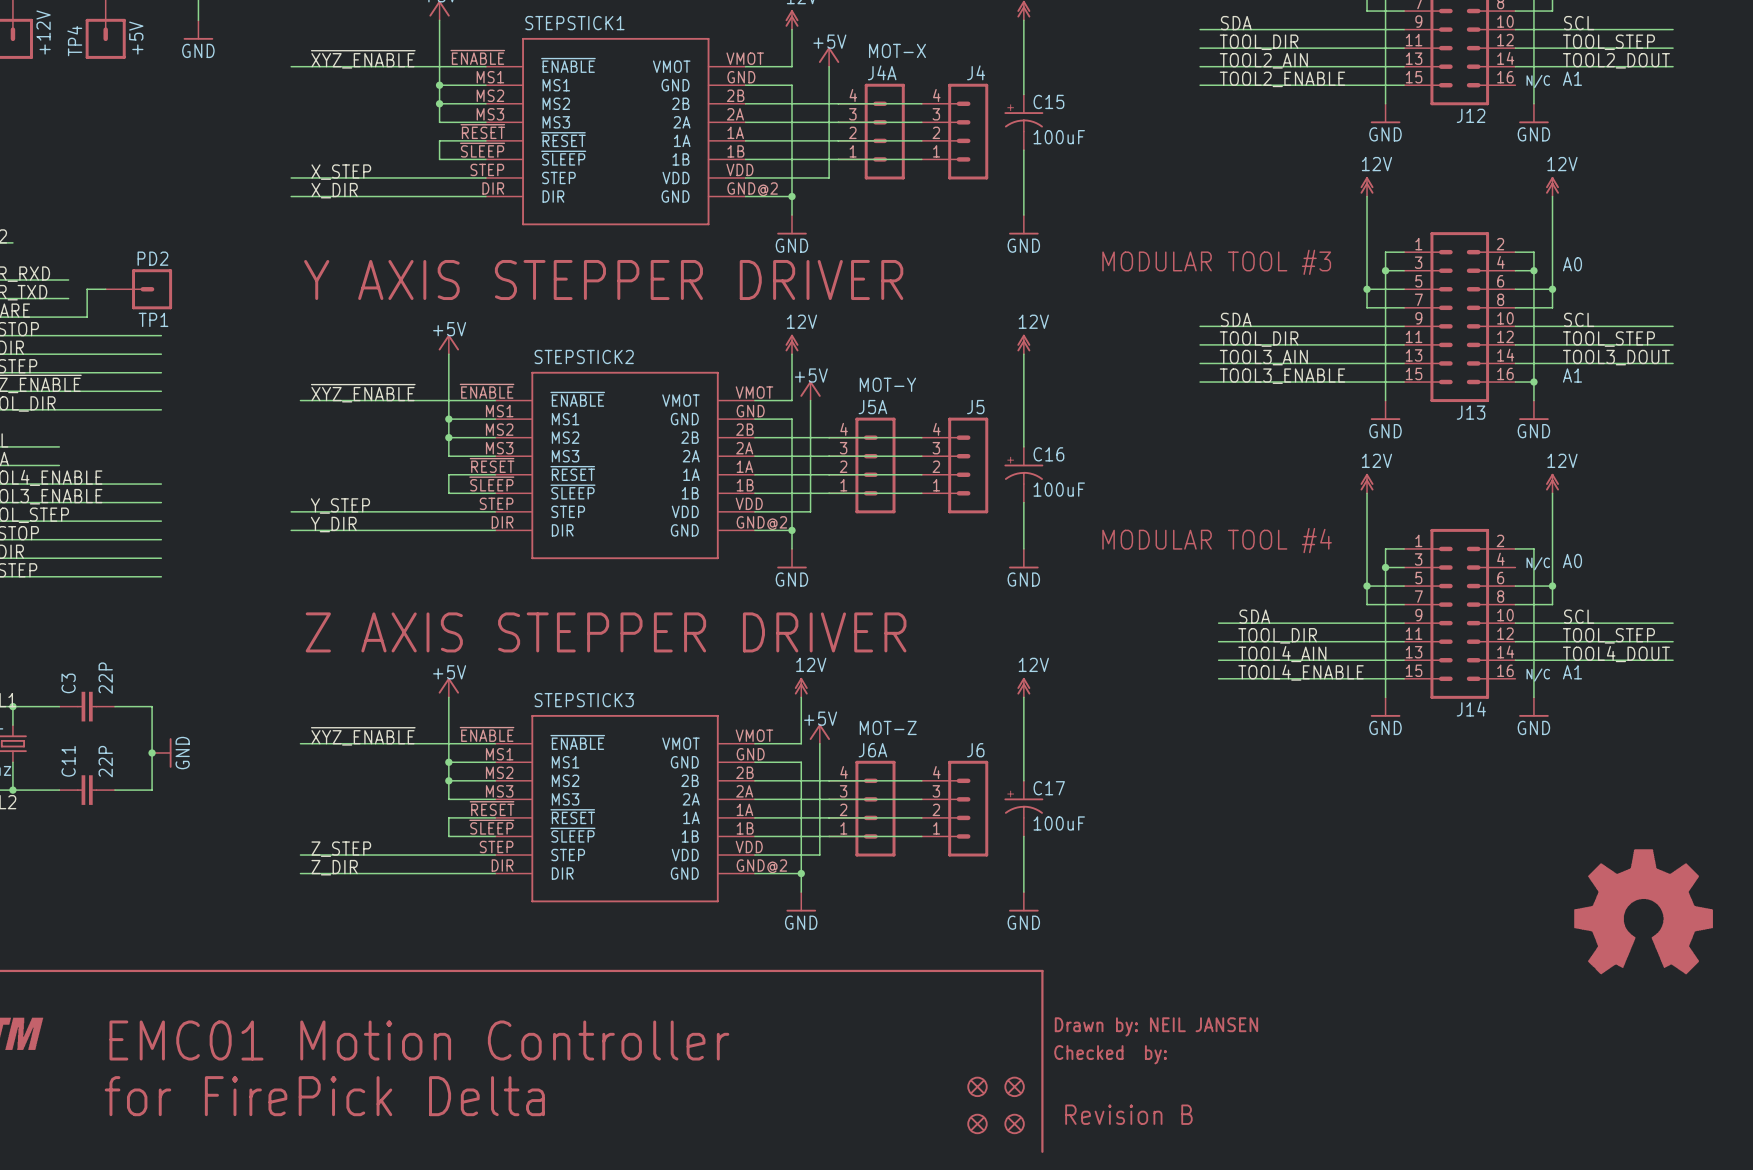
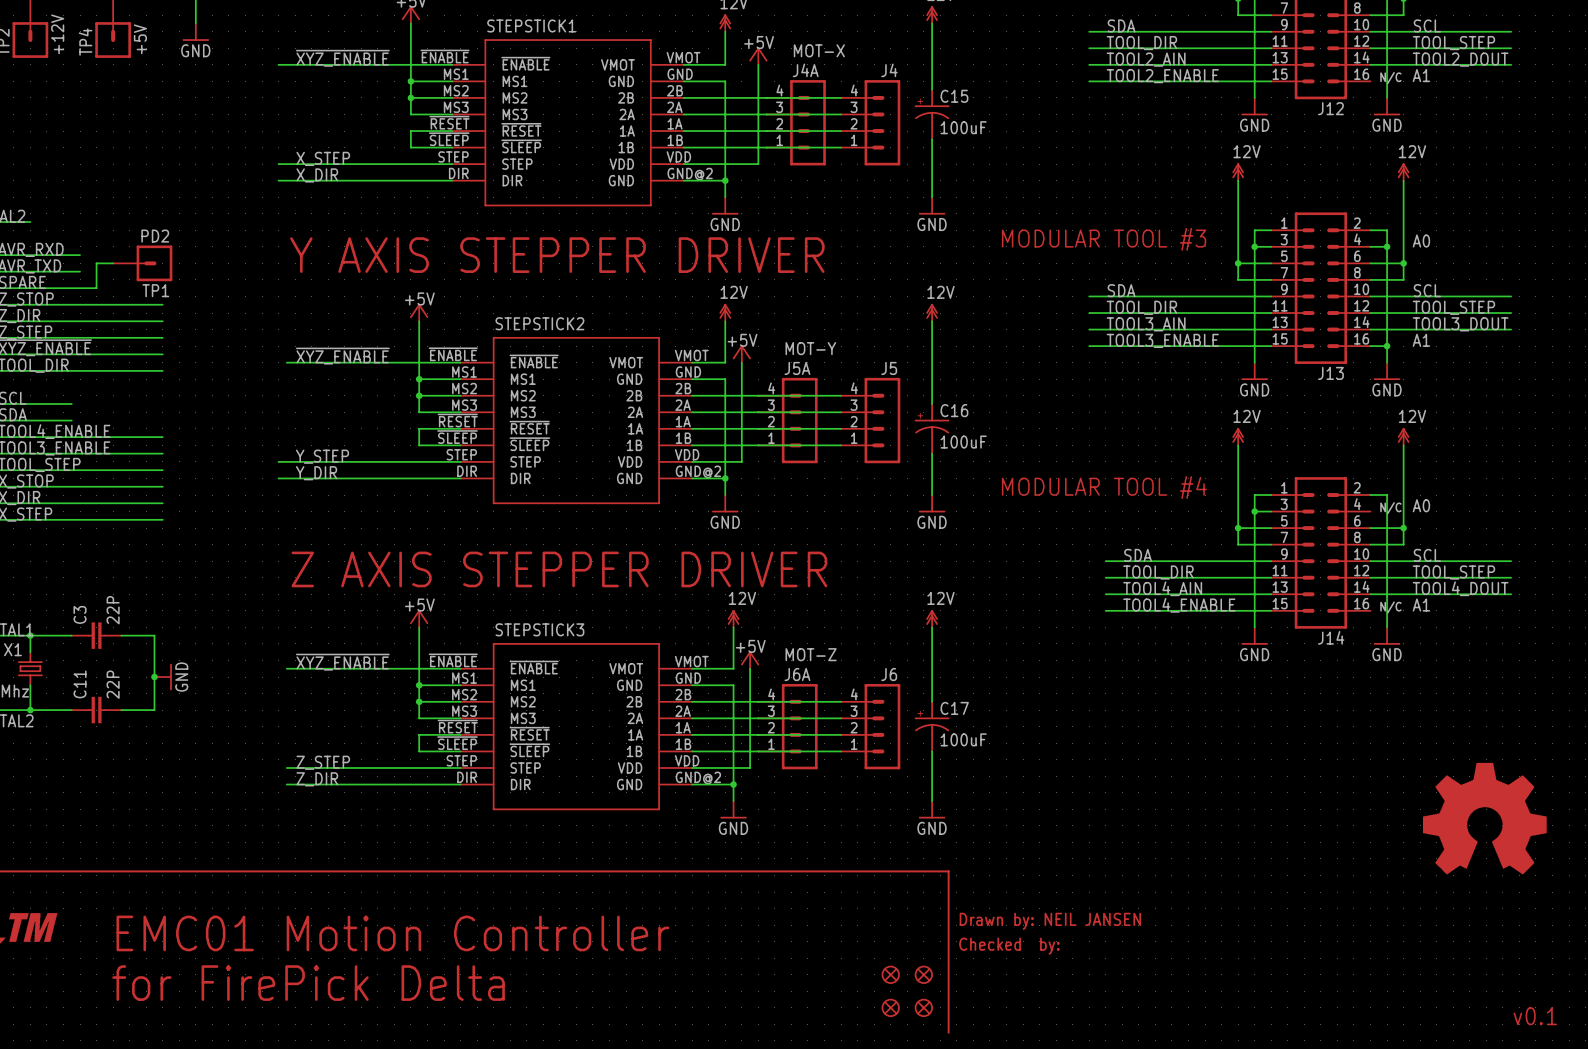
text: Revision B (1128, 1114) -> none
text: none -> v0.1 (1535, 1016)

